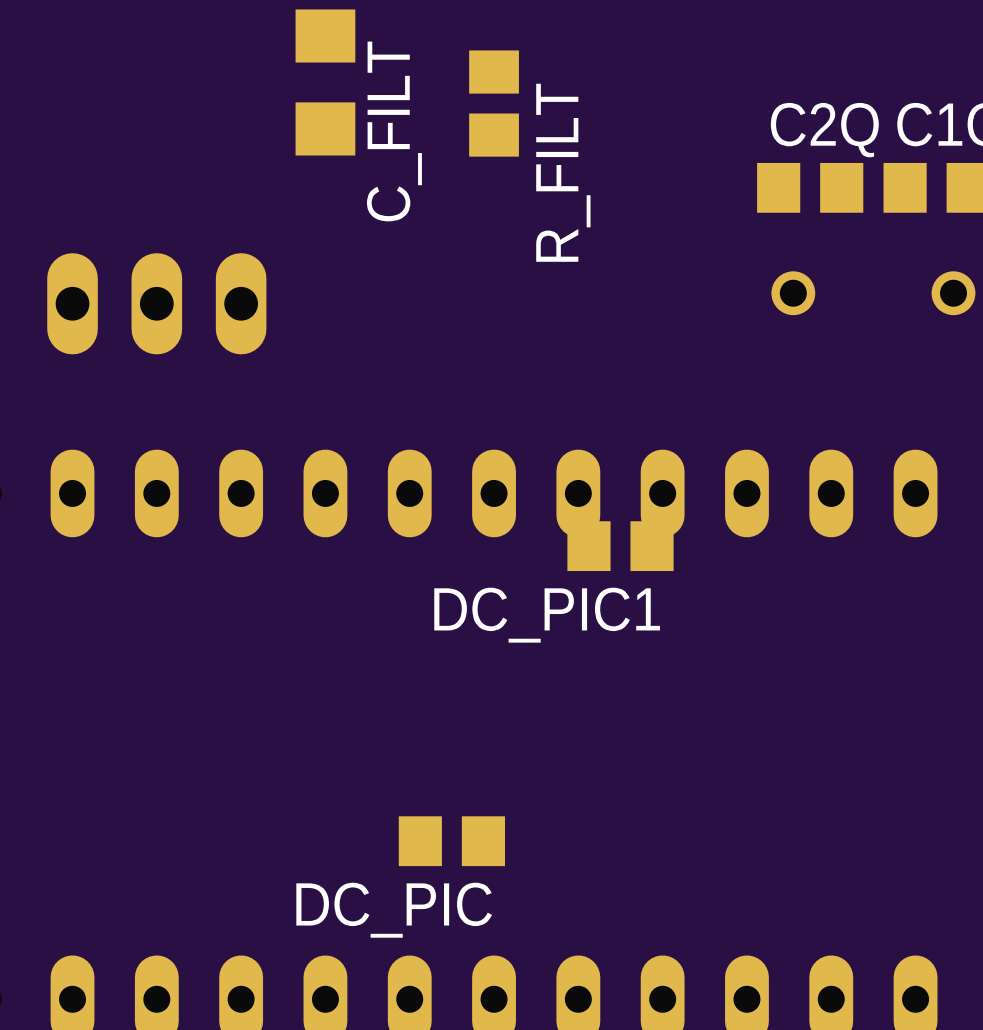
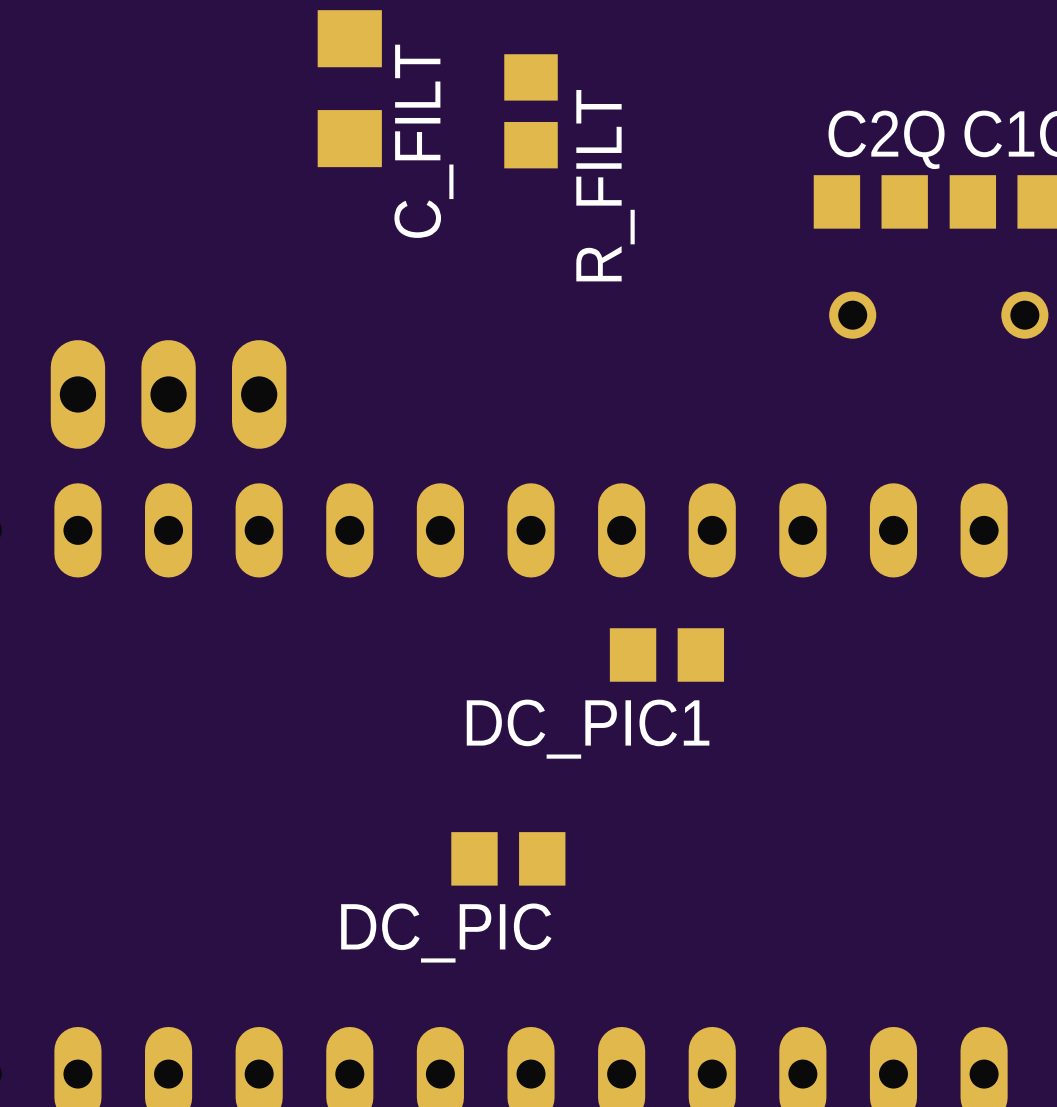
part position: (156, 303) -> (168, 394)
DC_PIC1 position: (620, 546) -> (666, 654)
DC_PIC position: (451, 841) -> (508, 858)

